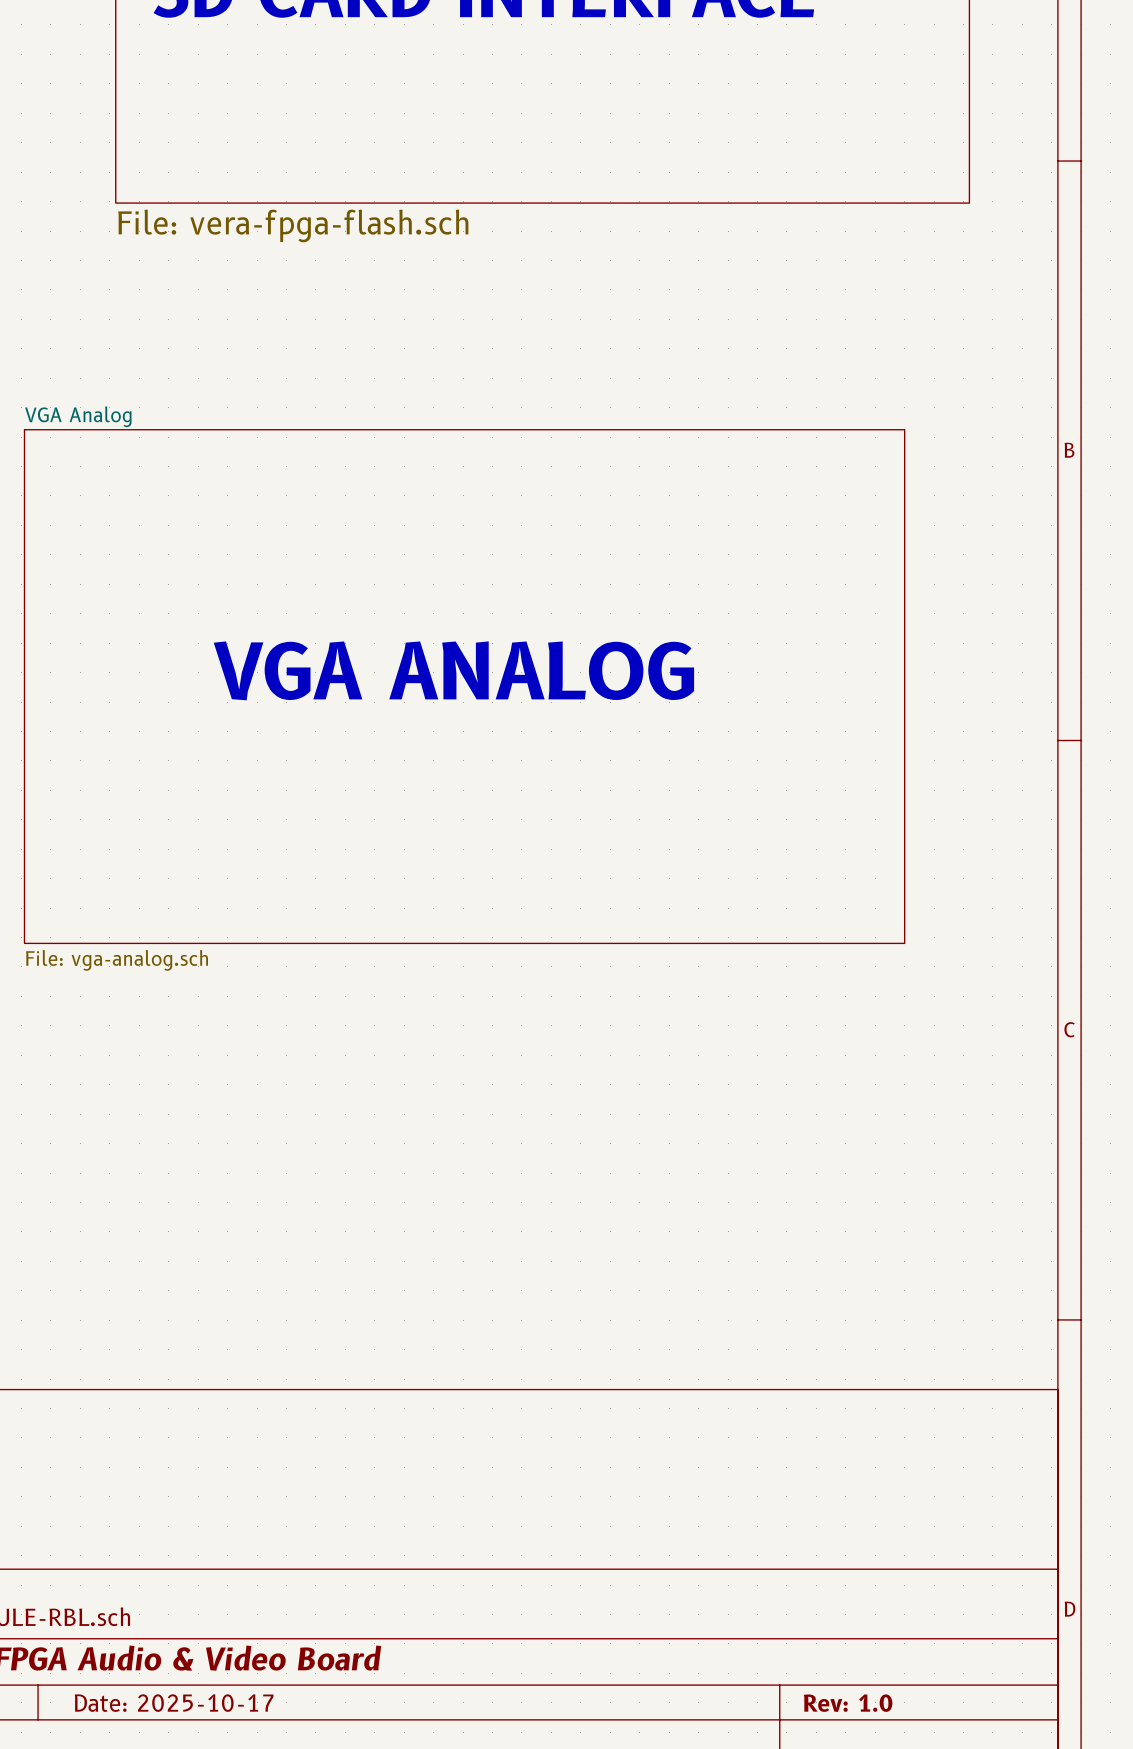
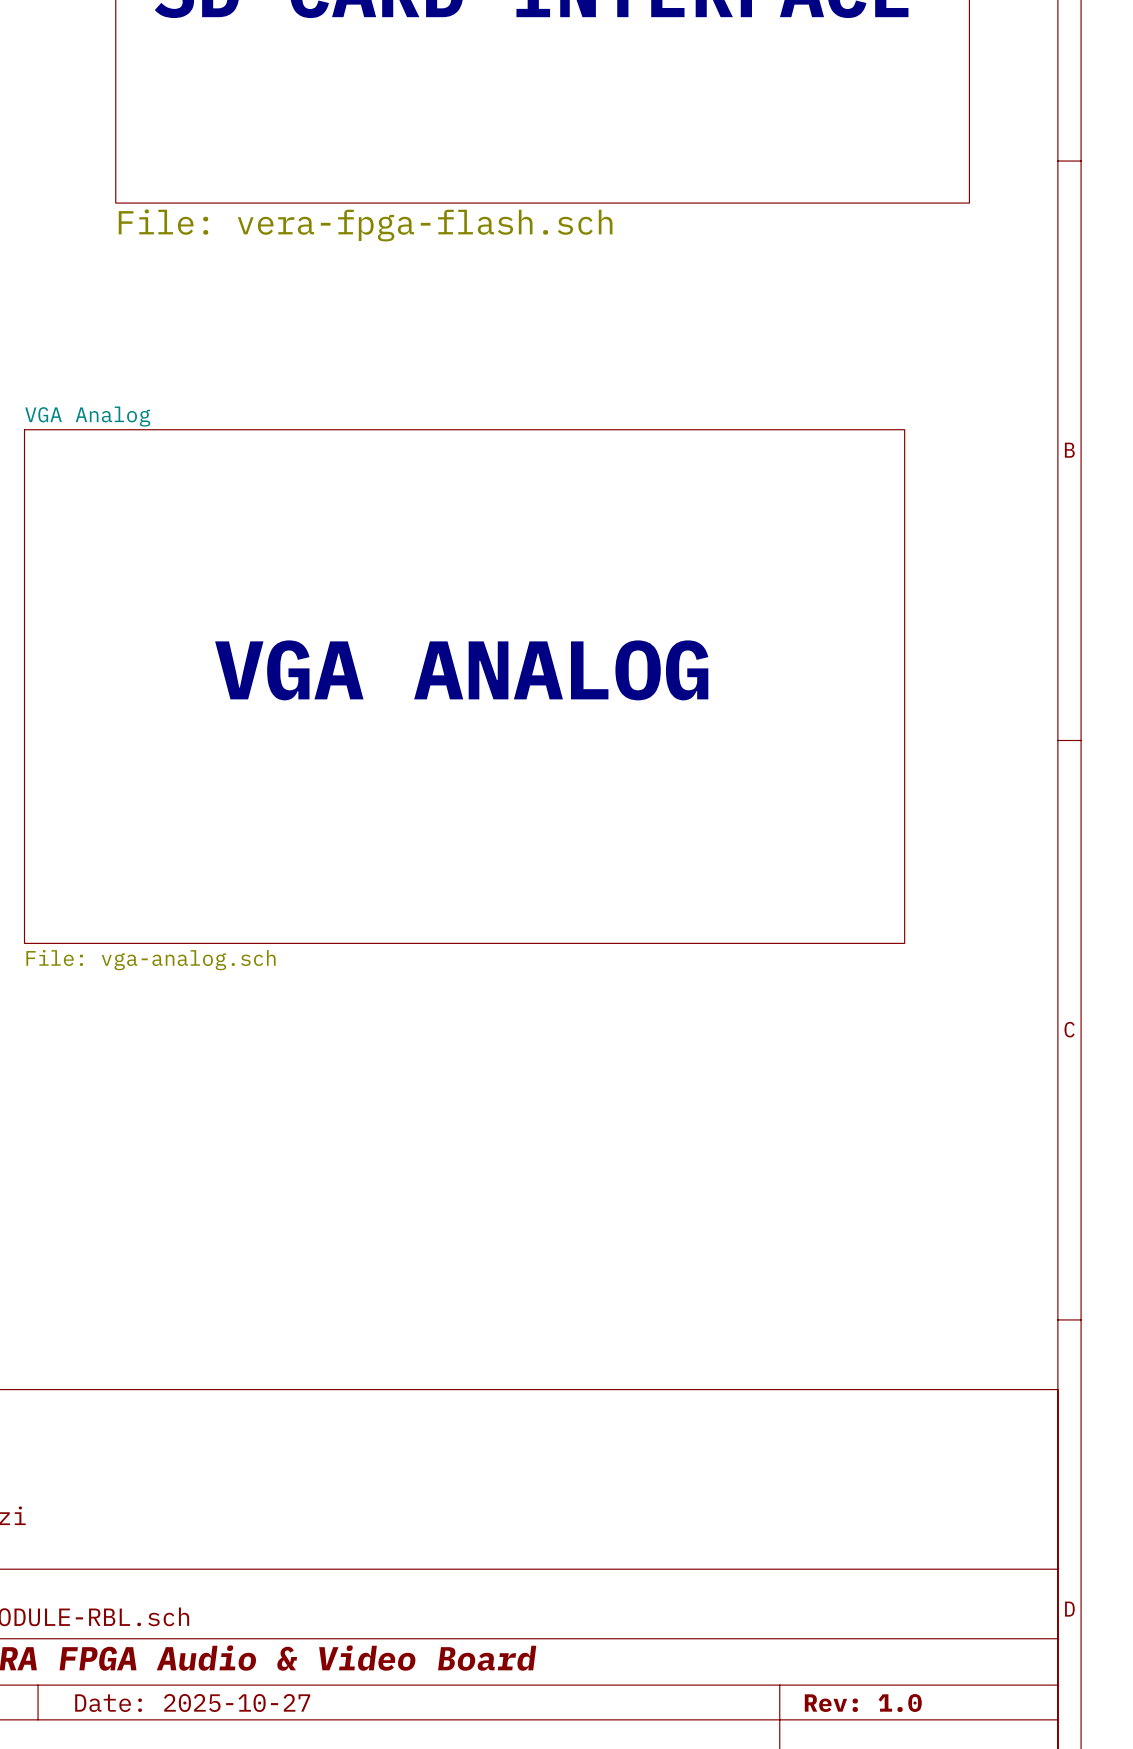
title block: Date: 2025-10-17 (174, 1703) -> Date: 2025-10-27 (192, 1702)

